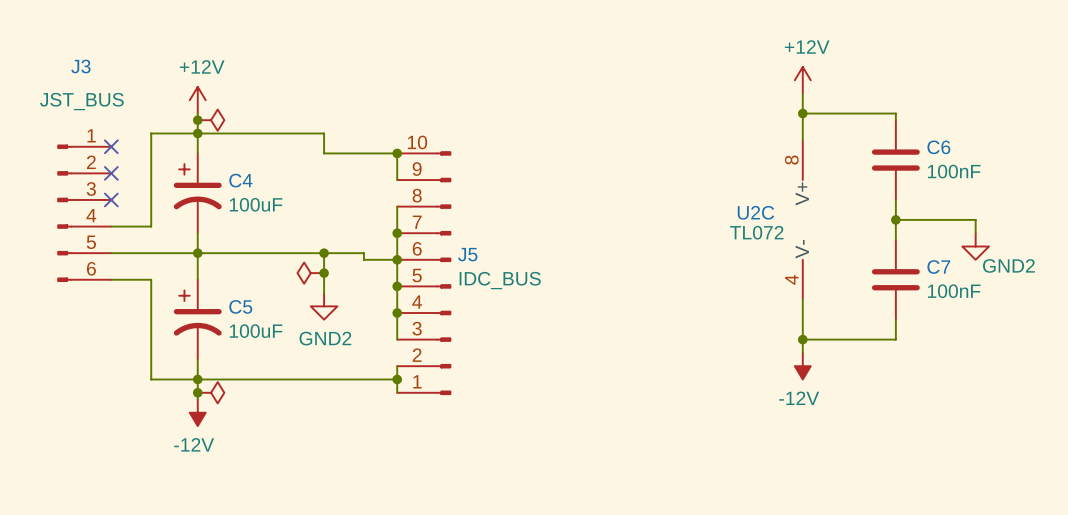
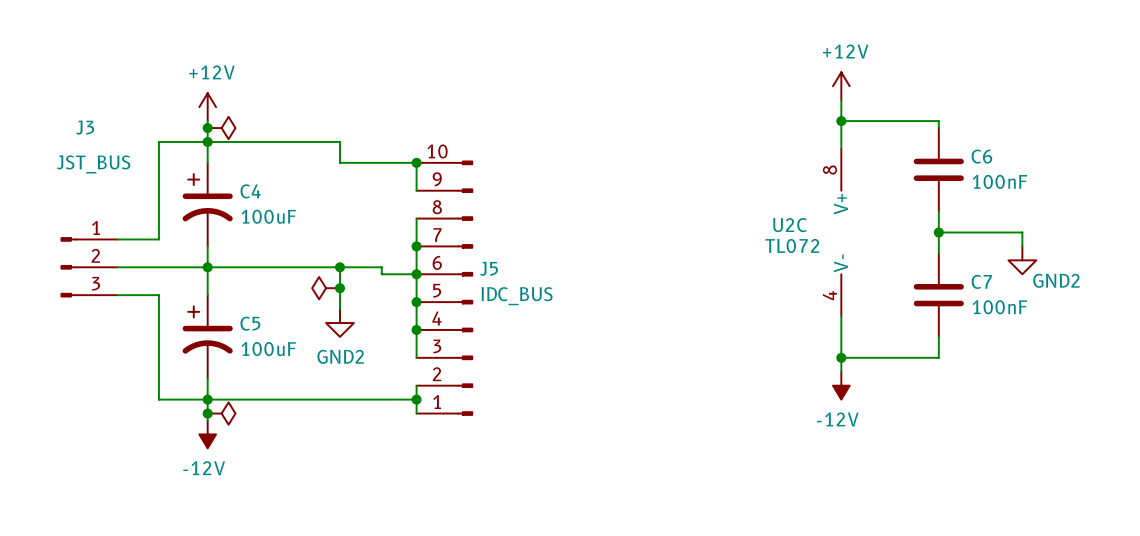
J3 symbol: [57, 144, 112, 282] -> [60, 237, 118, 298]
no-connect mark: (111, 146) -> none
no-connect mark: (111, 173) -> none
no-connect mark: (111, 199) -> none

